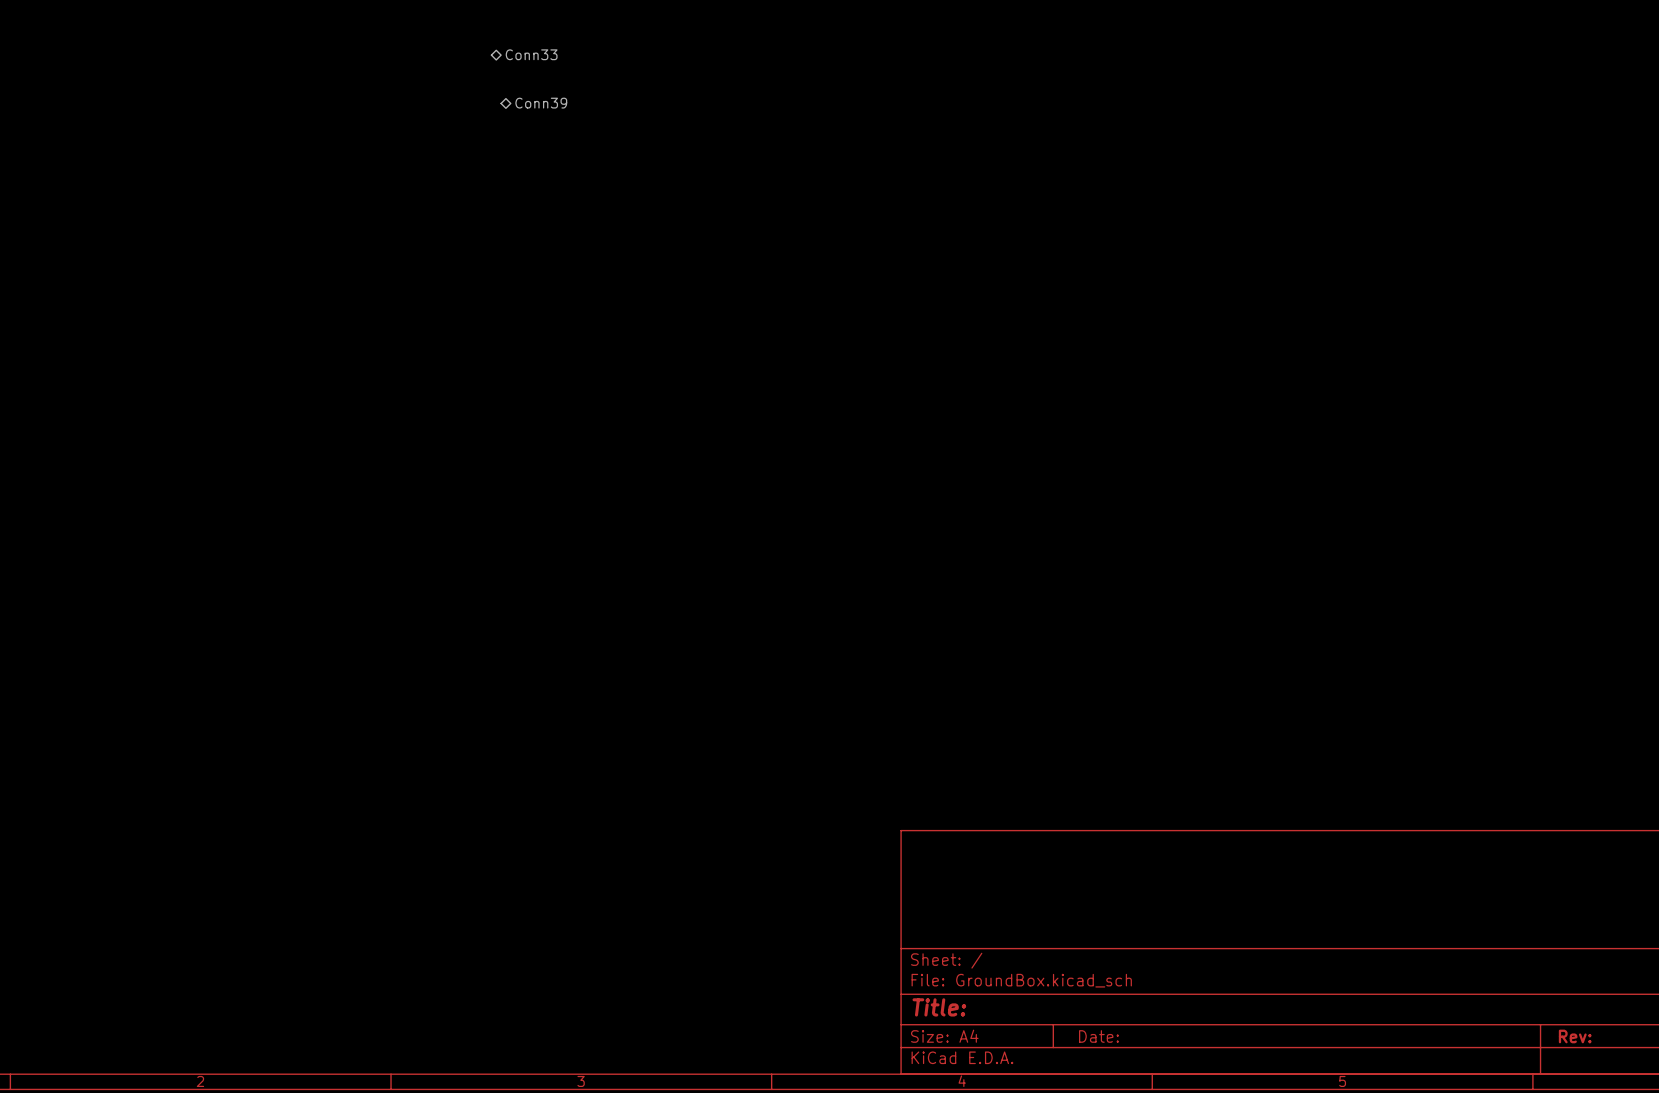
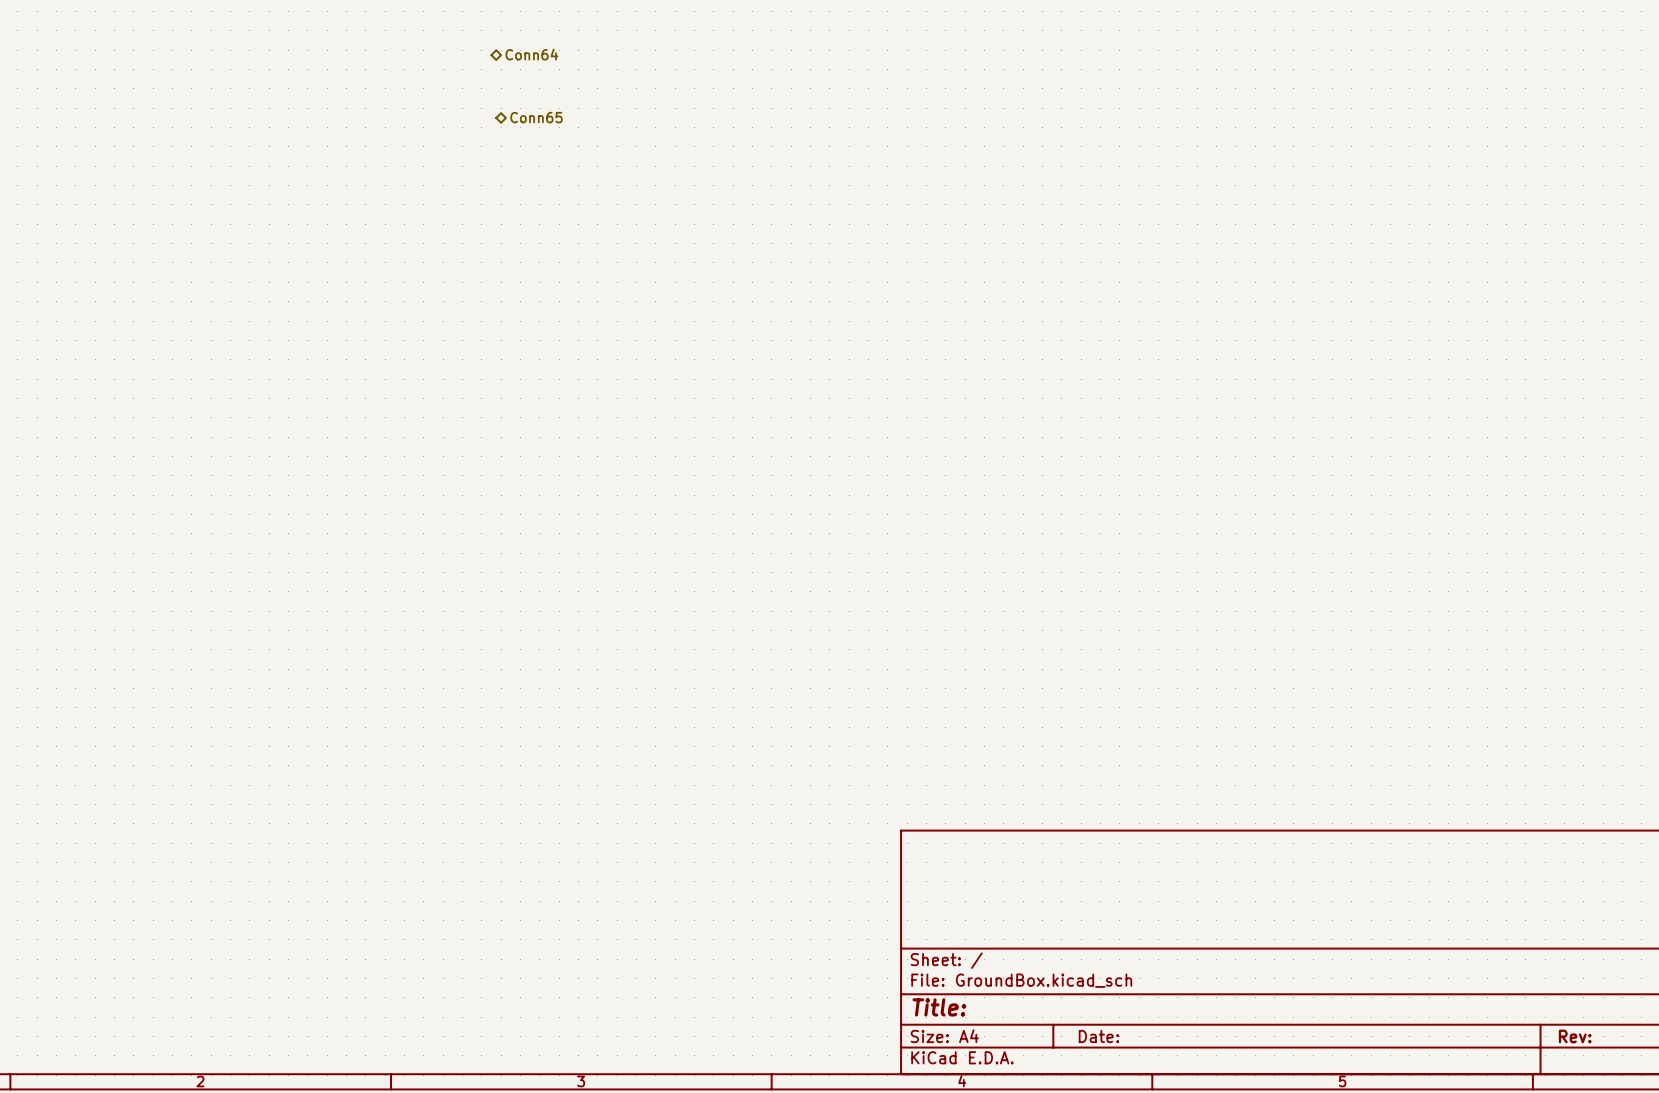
hierarchical label: Conn33 (531, 54) -> Conn64 (531, 54)
hierarchical label: Conn39 (541, 103) -> Conn65 (536, 117)

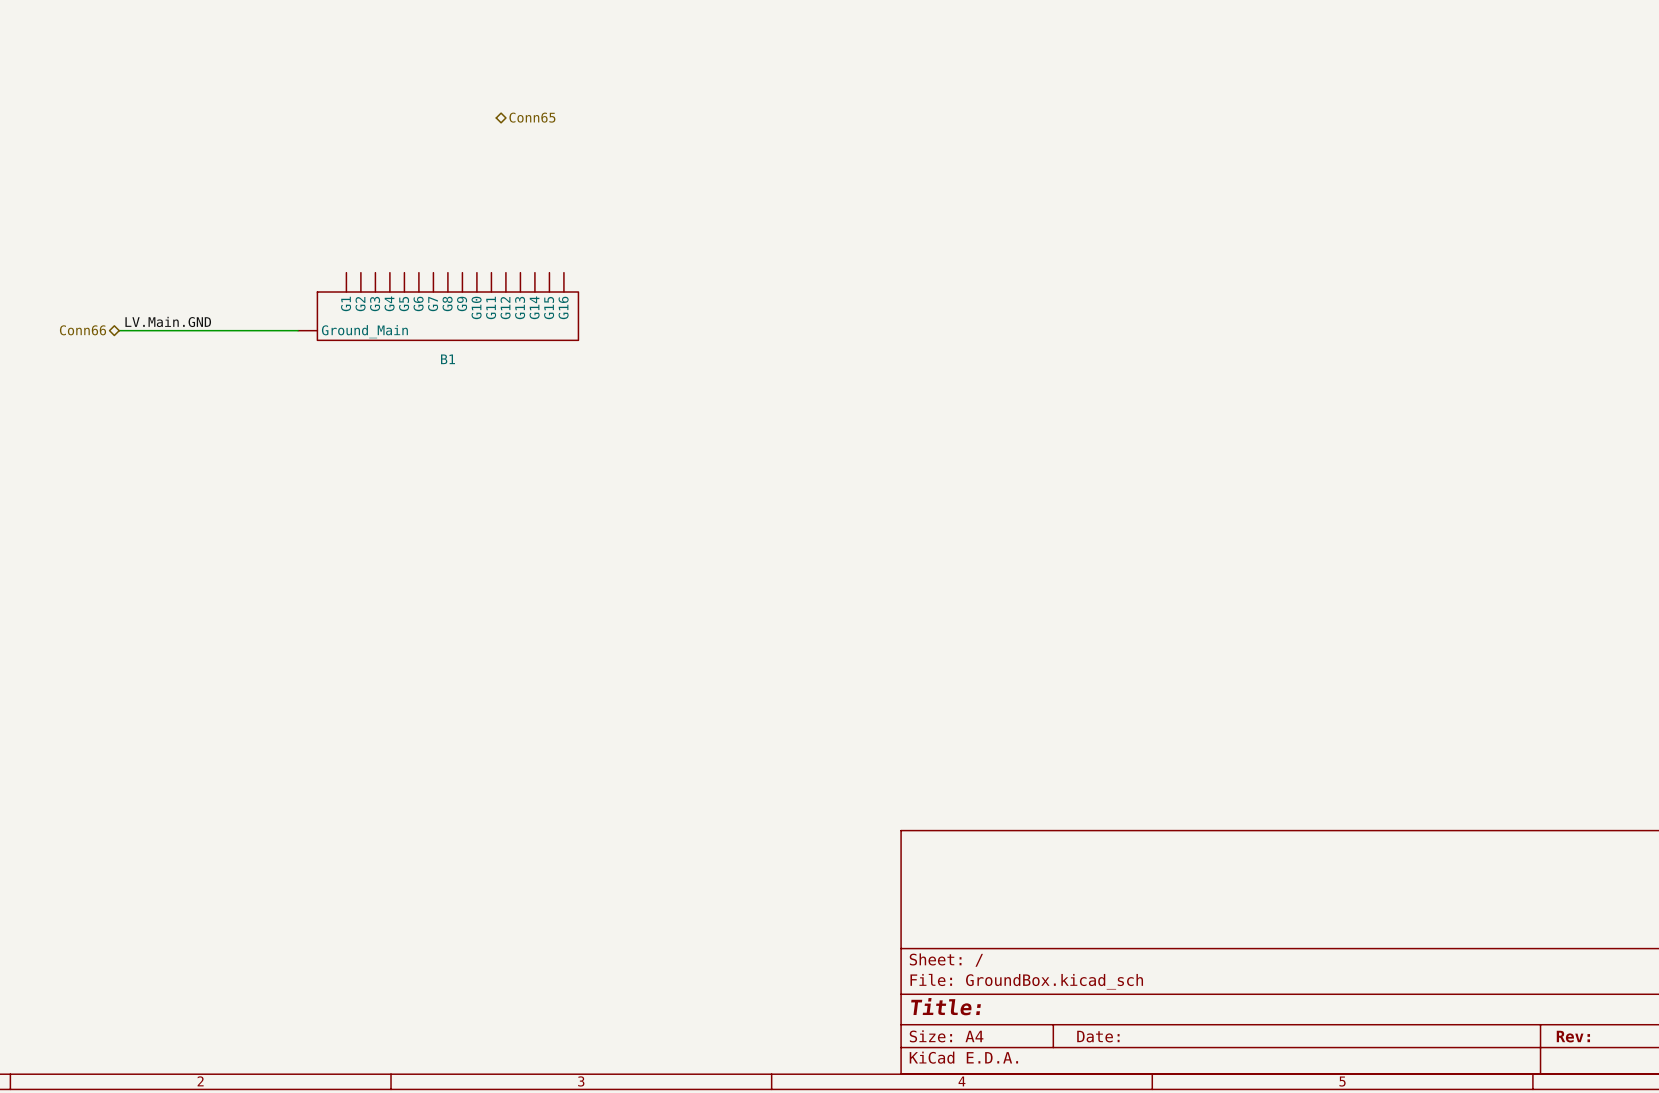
hierarchical label: Conn64 (531, 54) -> none
B1: none -> (438, 306)
label: none -> LV.Main.GND (168, 321)
hierarchical label: none -> Conn66 (82, 330)
wire: none -> (119, 330) (298, 330)

